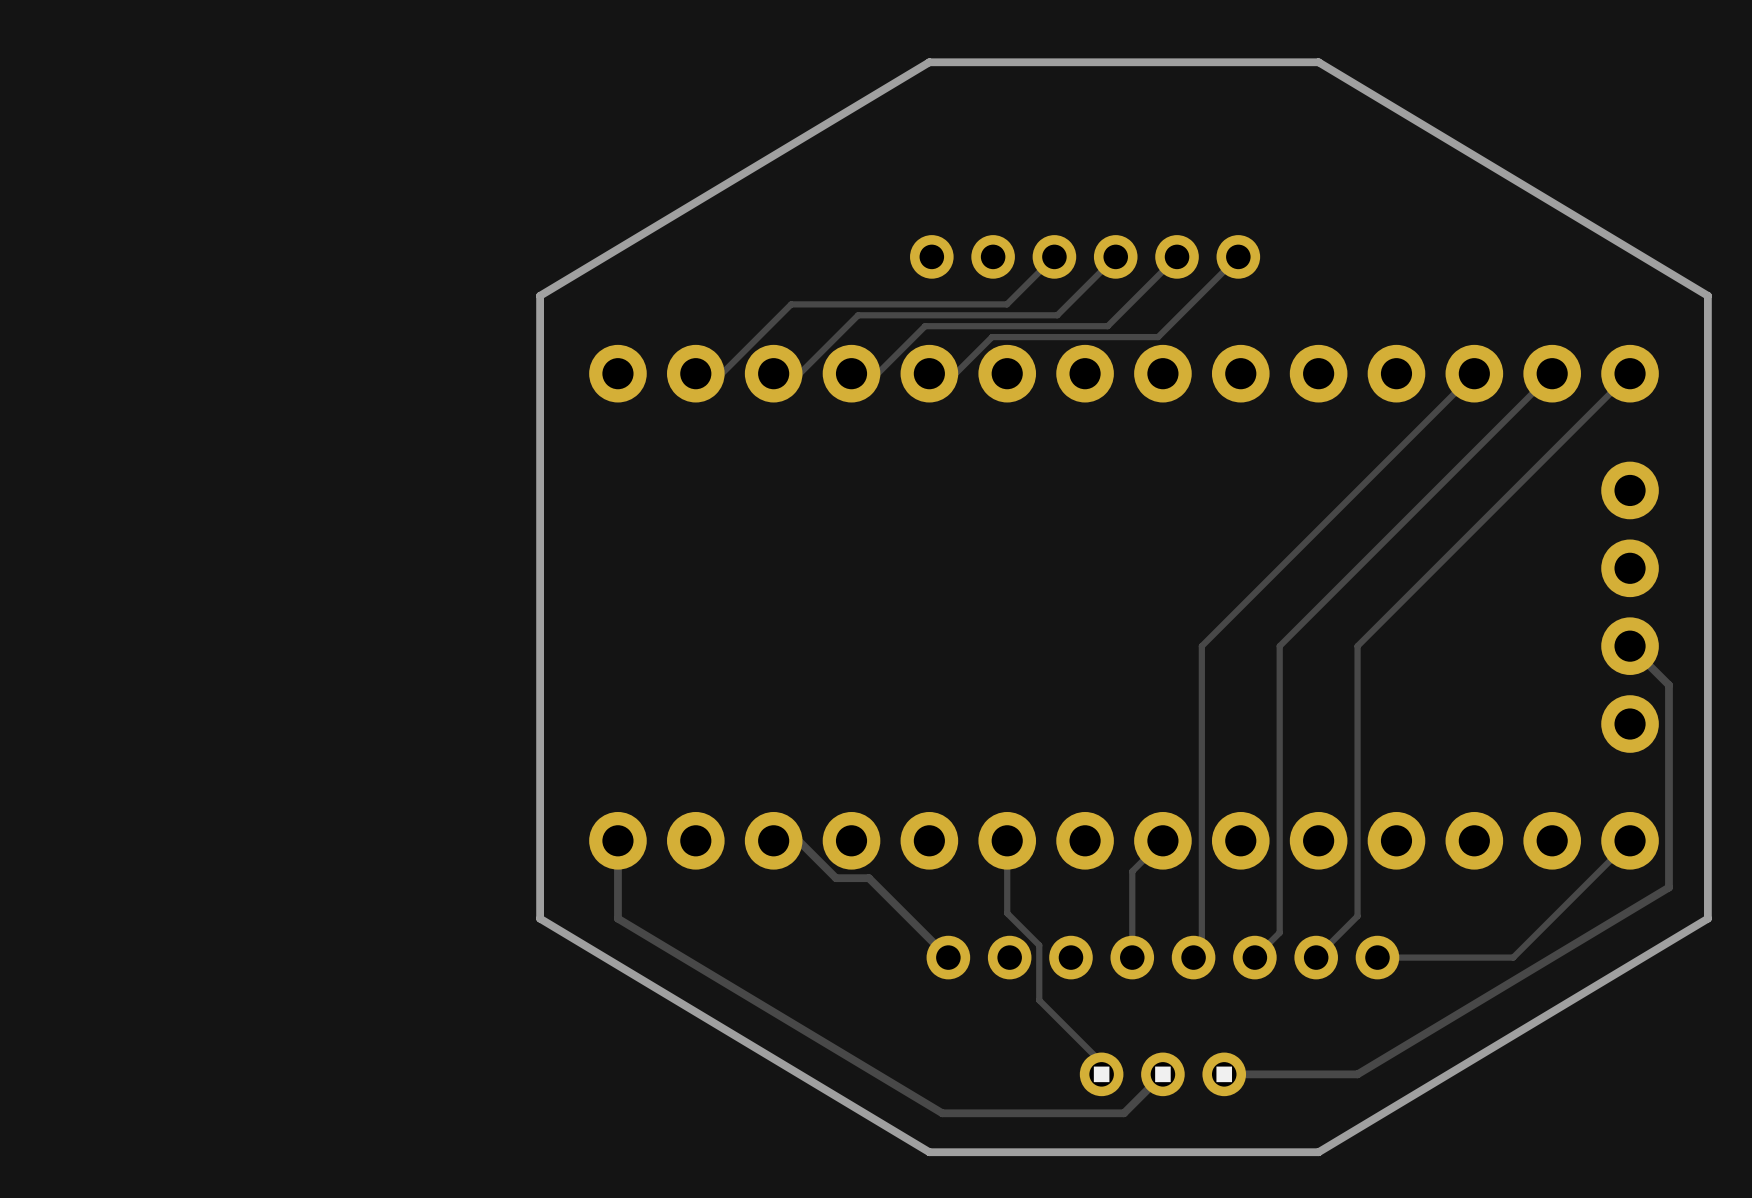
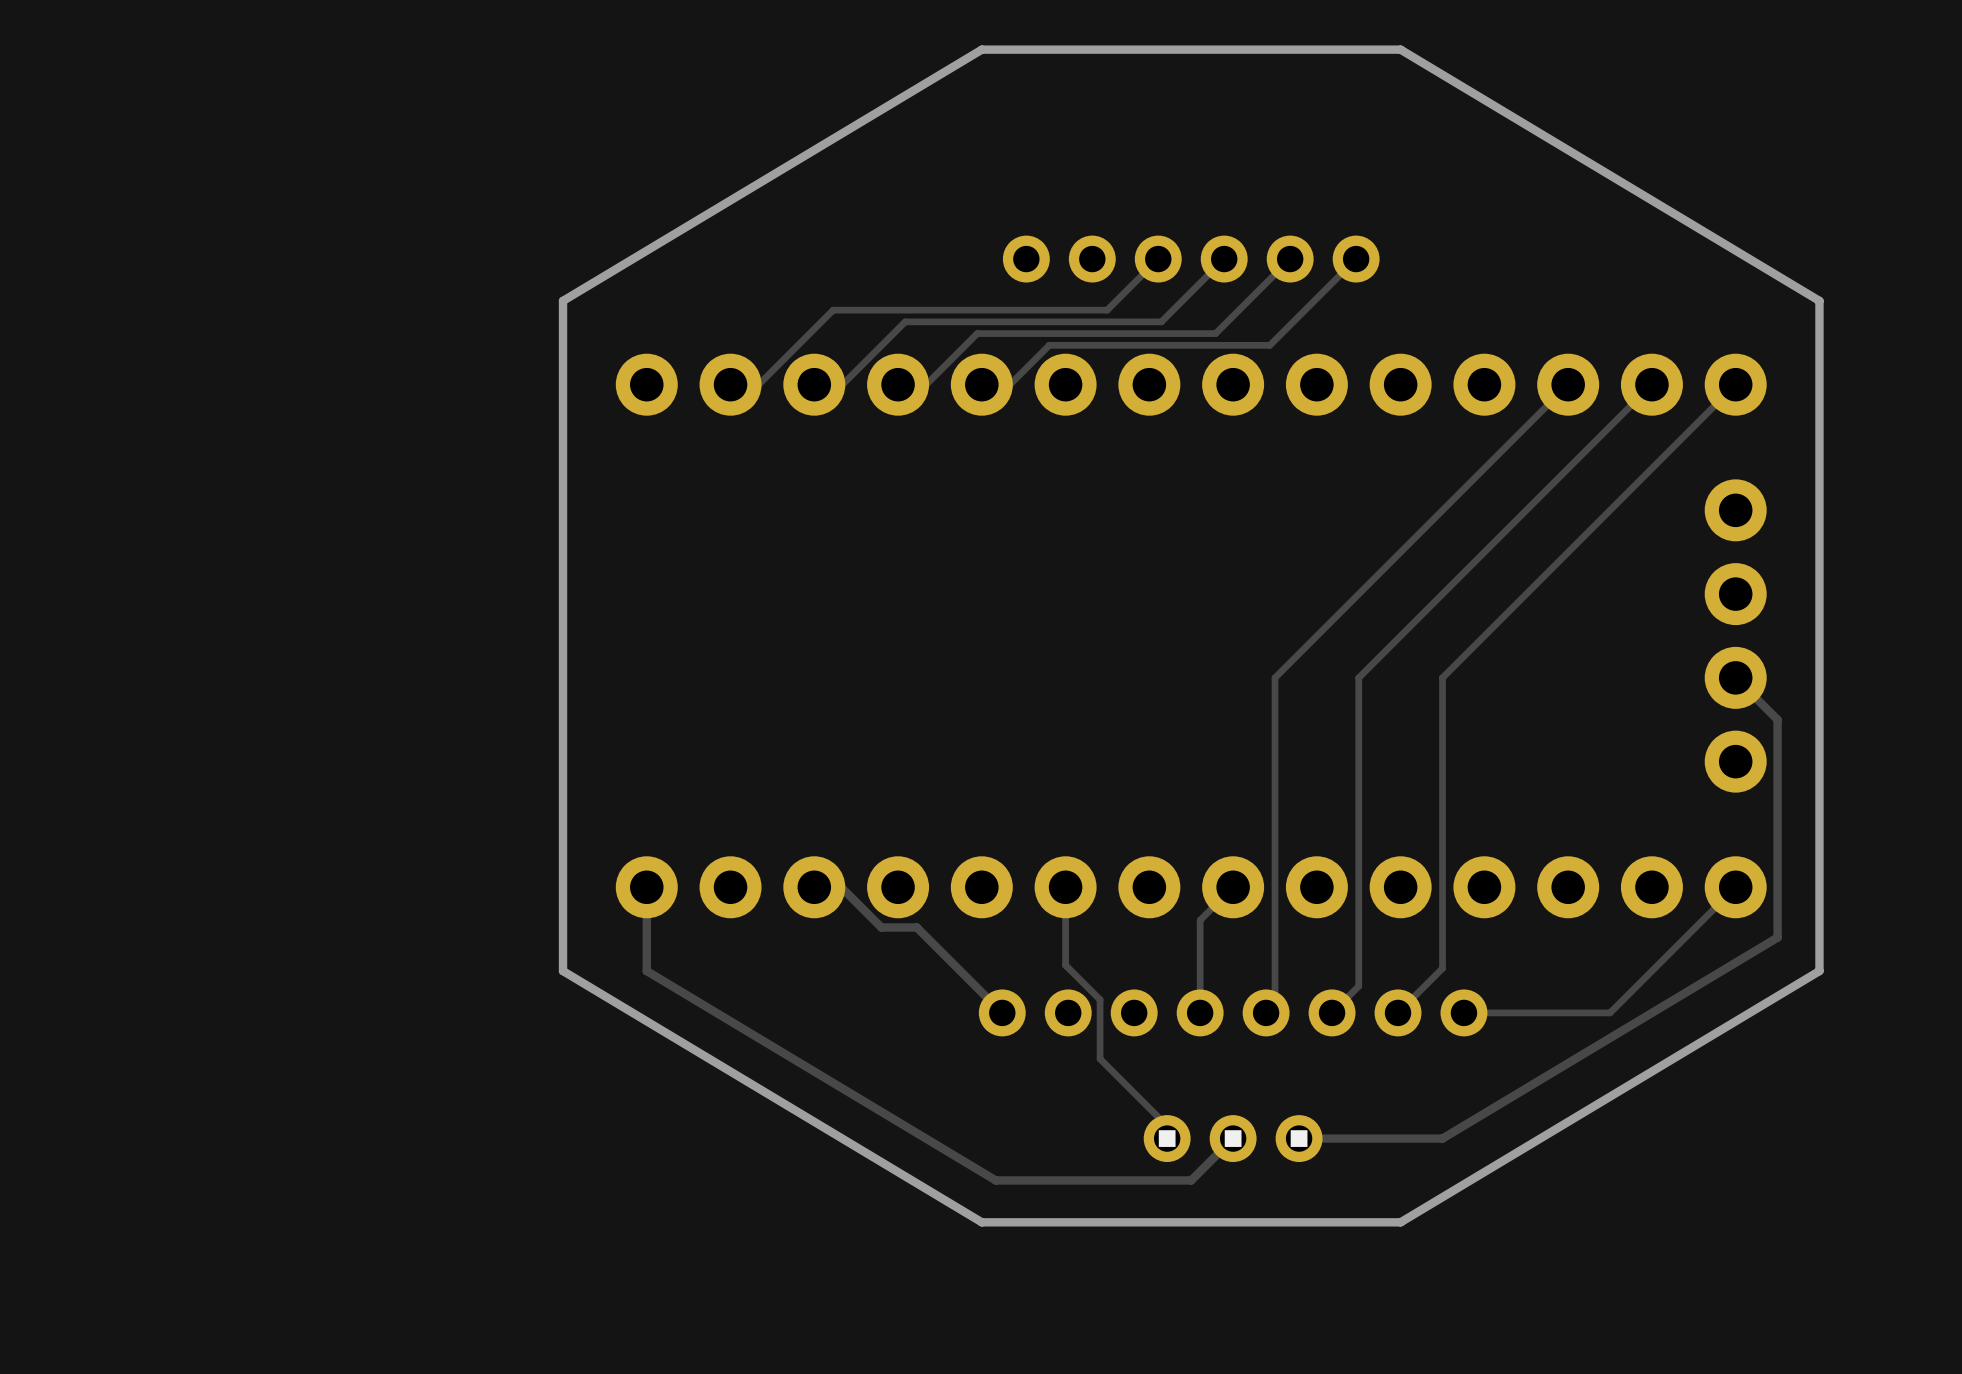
track: (1054, 256) (1006, 304) -> (1158, 259) (1107, 310) (1065, 310)
part position: (1085, 256) -> (1191, 259)
track: (1115, 256) (1057, 315) -> (1224, 259) (1161, 321) (1119, 321)
track: (1177, 256) (1107, 326) -> (1290, 259) (1215, 333) (1173, 333)
track: (1238, 256) (1158, 337) -> (1356, 259) (1269, 345) (1227, 345)

